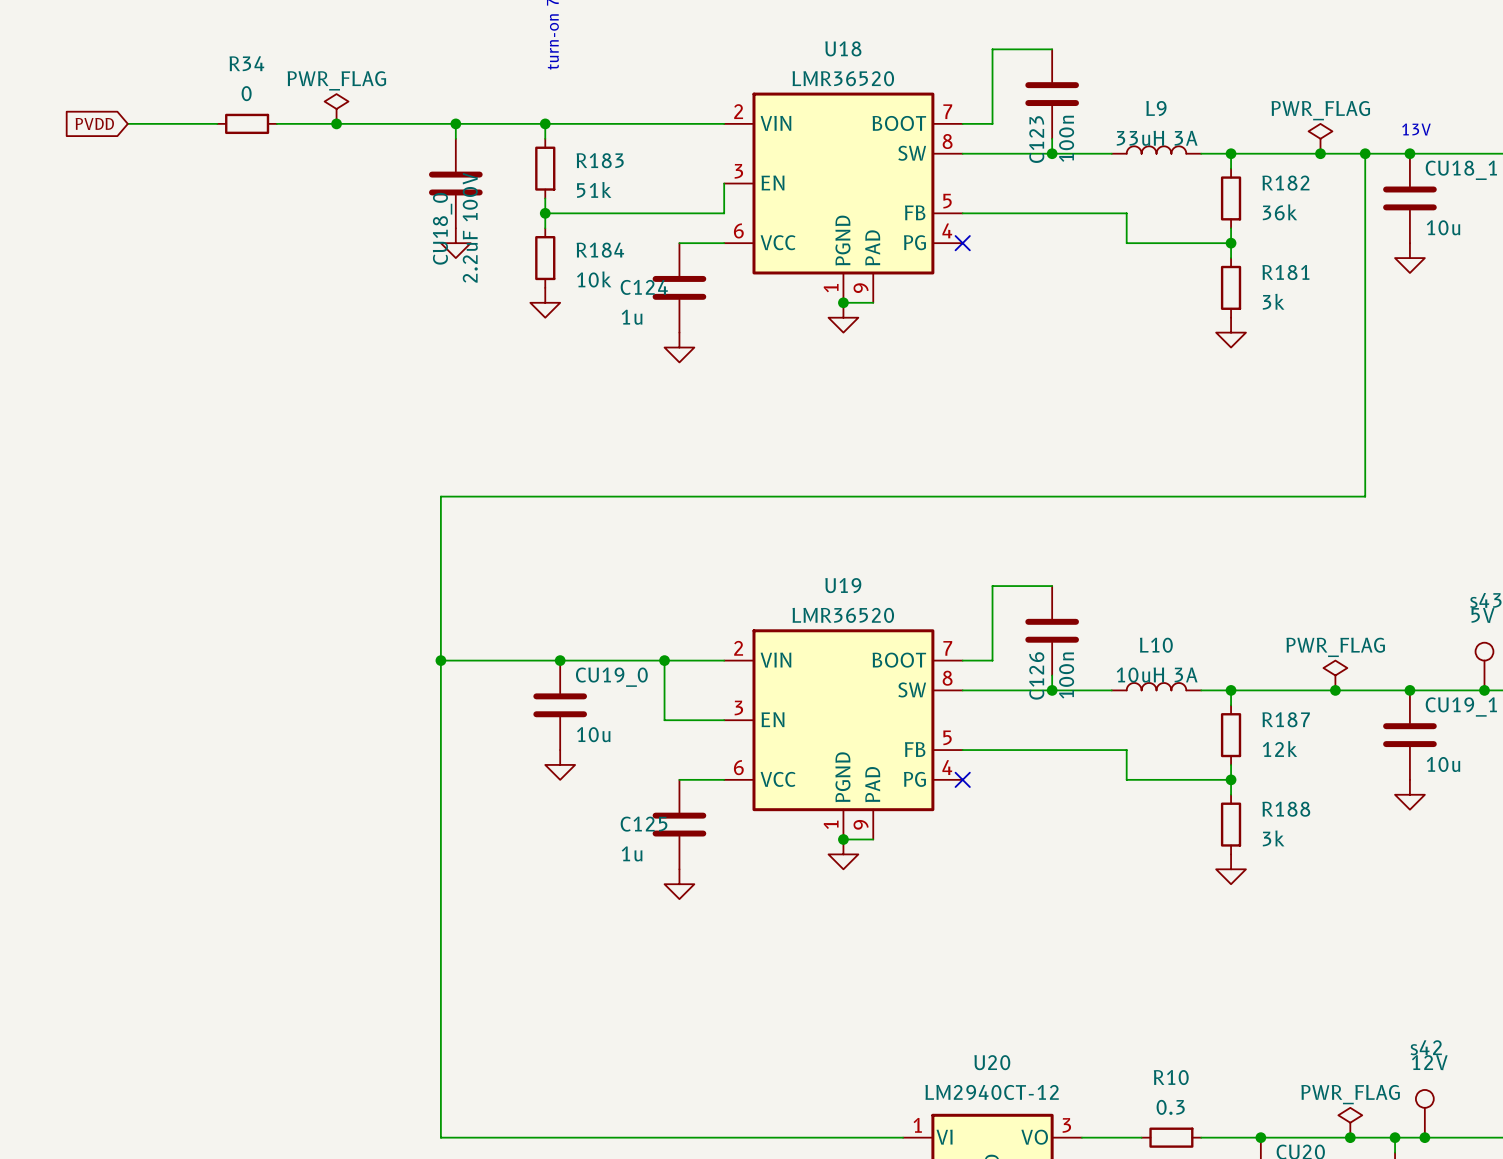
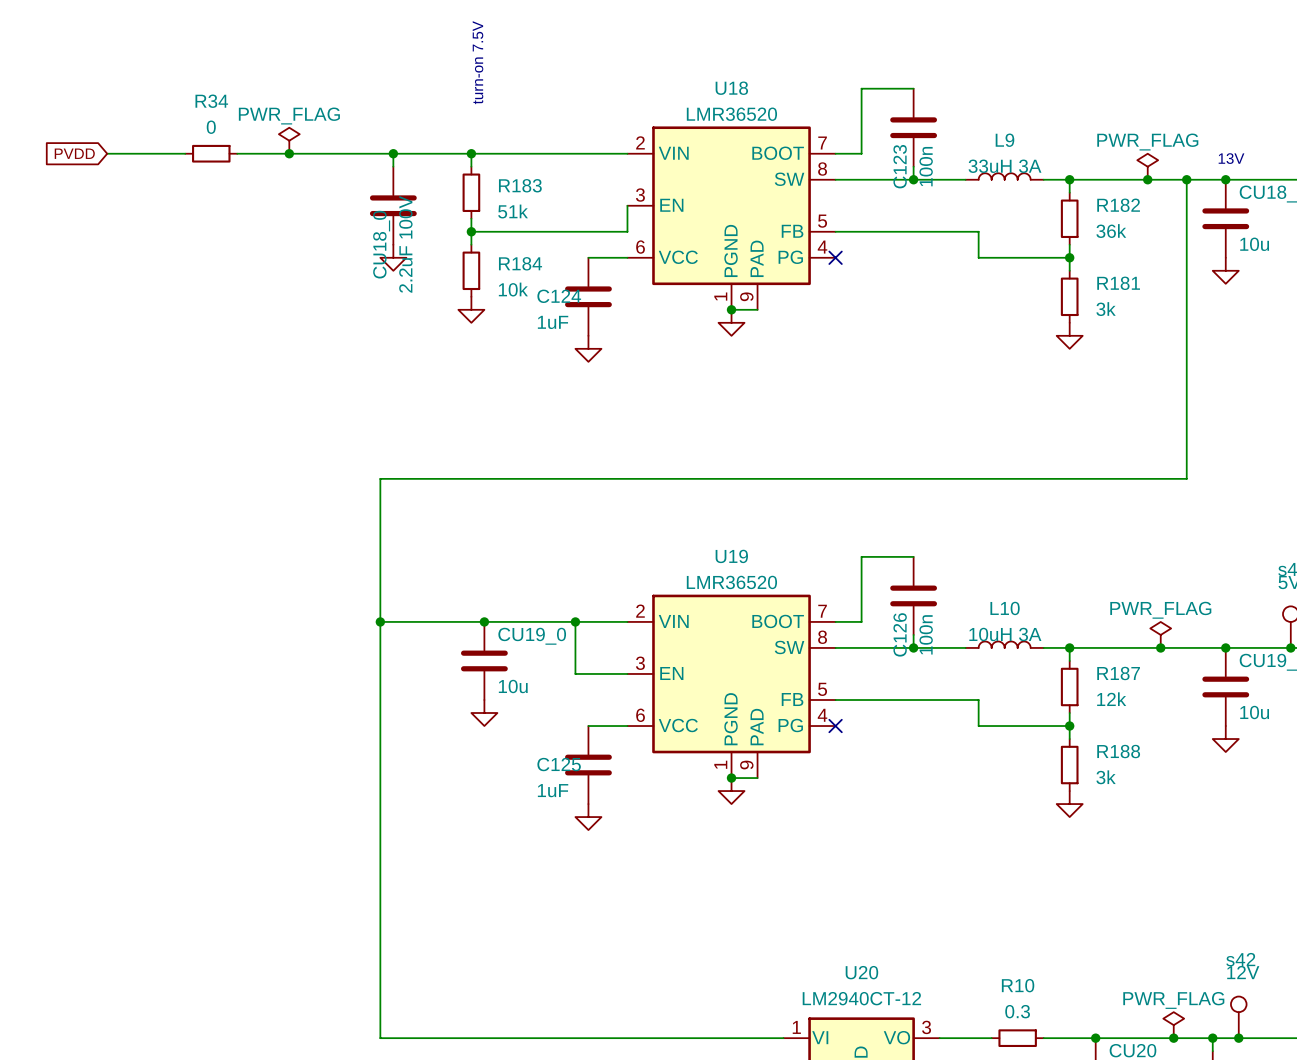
C124 value: 1u (632, 317) -> 1uF (553, 322)
C125 value: 1u (632, 853) -> 1uF (553, 790)

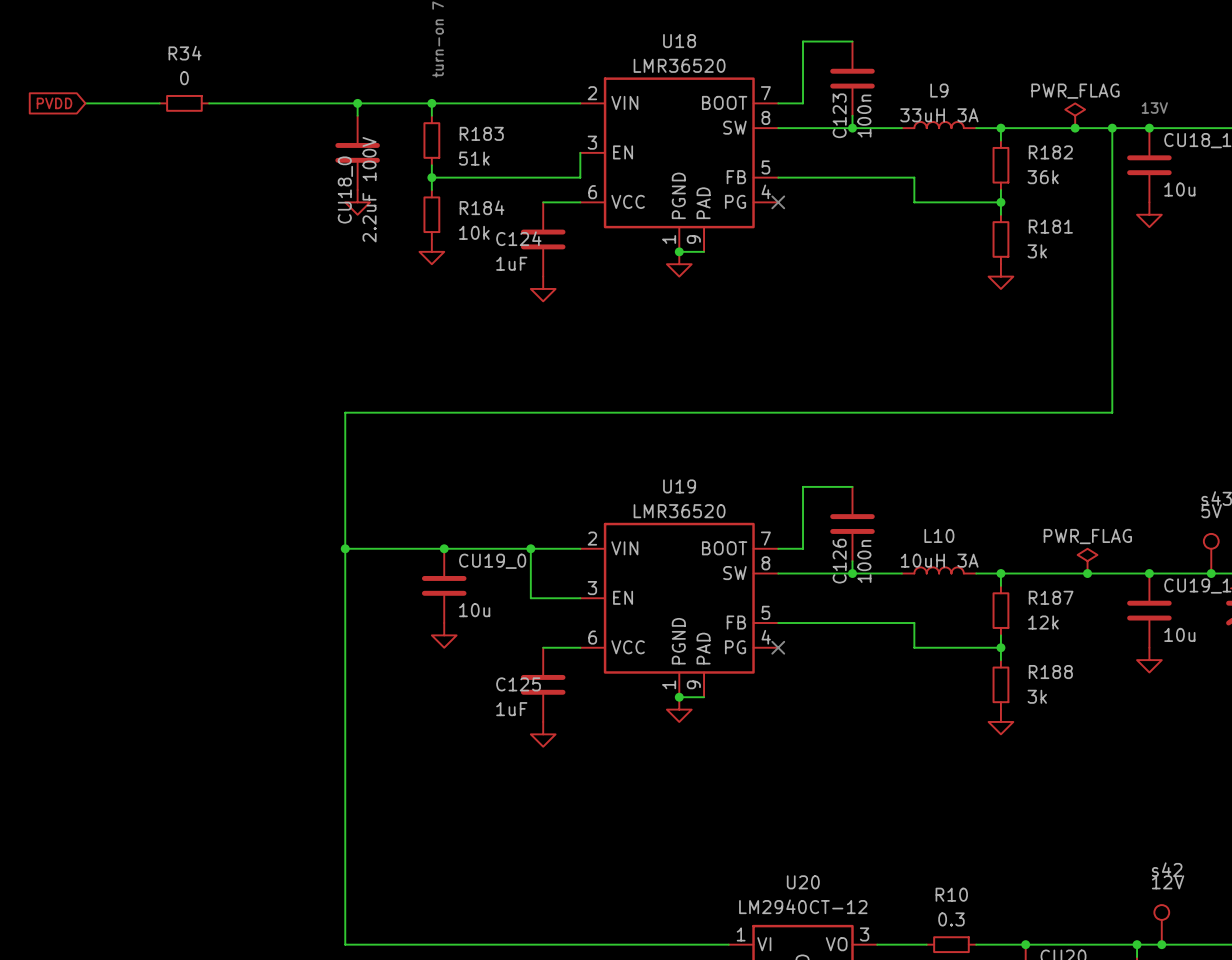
power symbol: PWR_FLAG (289, 140) -> none
junction: (289, 153) -> none
power symbol: PWR_FLAG (1173, 1025) -> none
junction: (1173, 1038) -> none

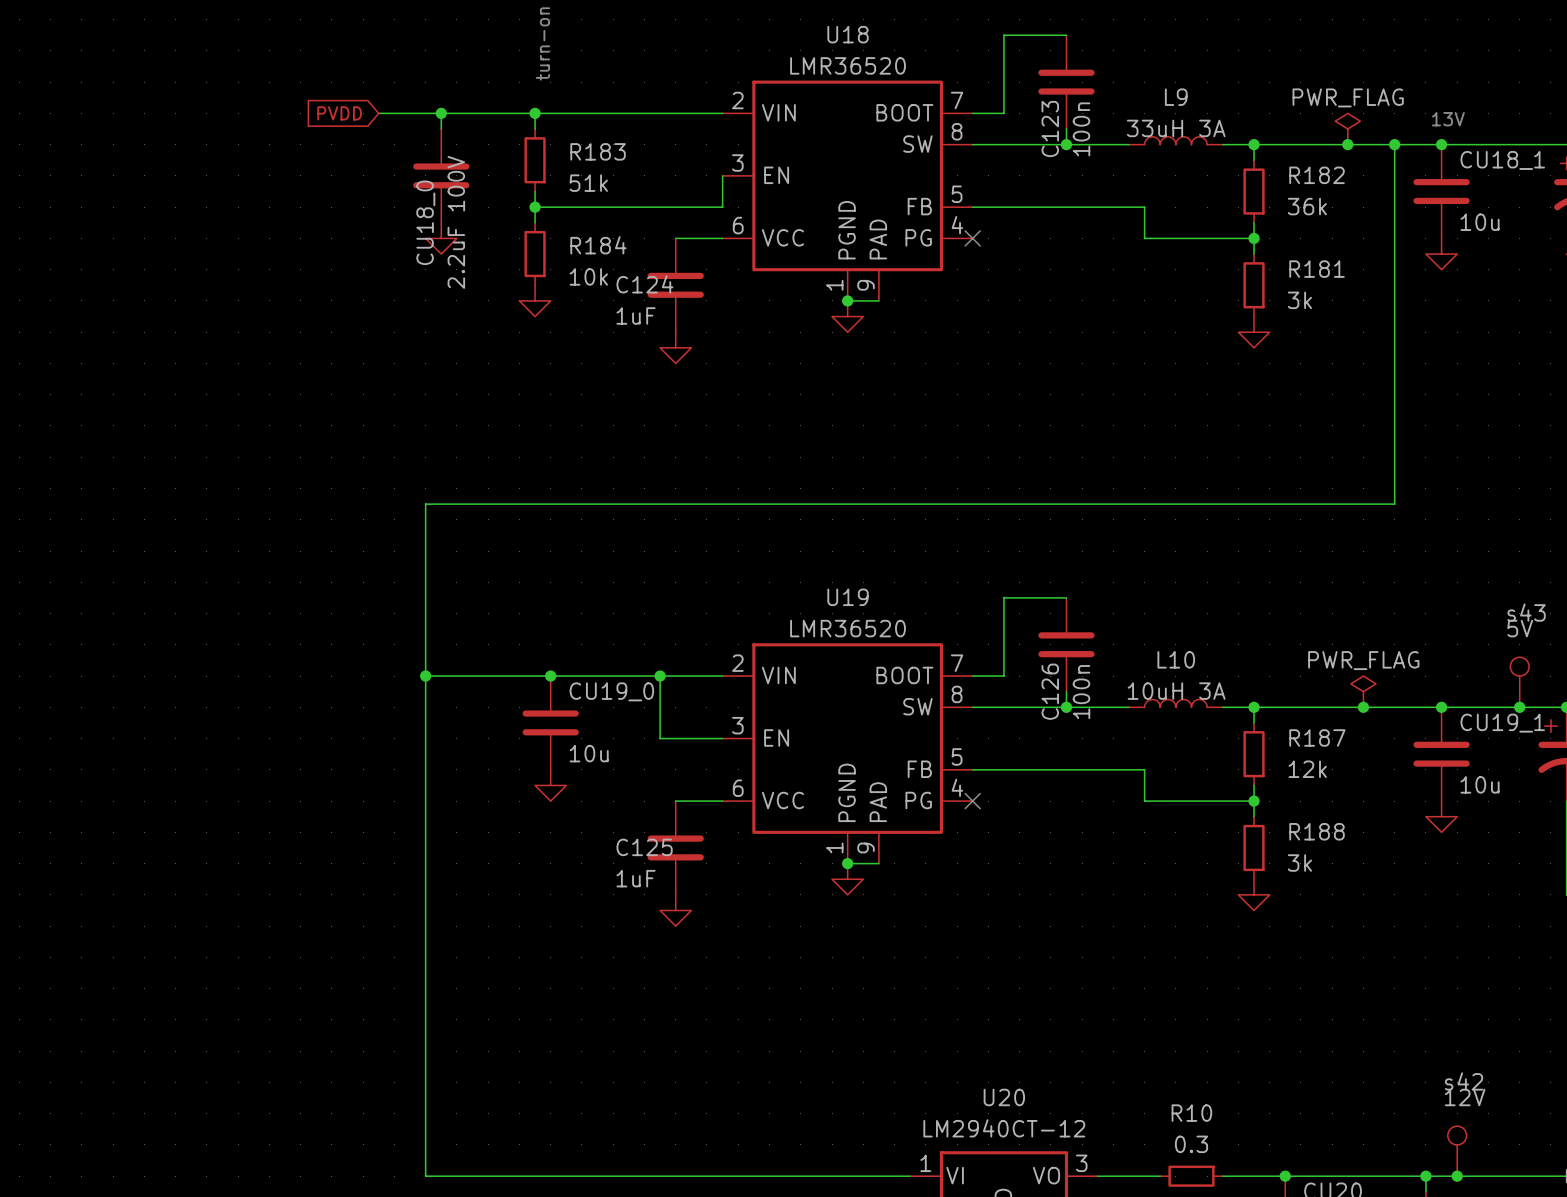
global label position: PVDD (54, 103) -> PVDD (339, 113)
wire: (85, 103) (159, 103) -> none
R34: 0 (184, 103) -> none
wire: (209, 103) (308, 103) -> none

